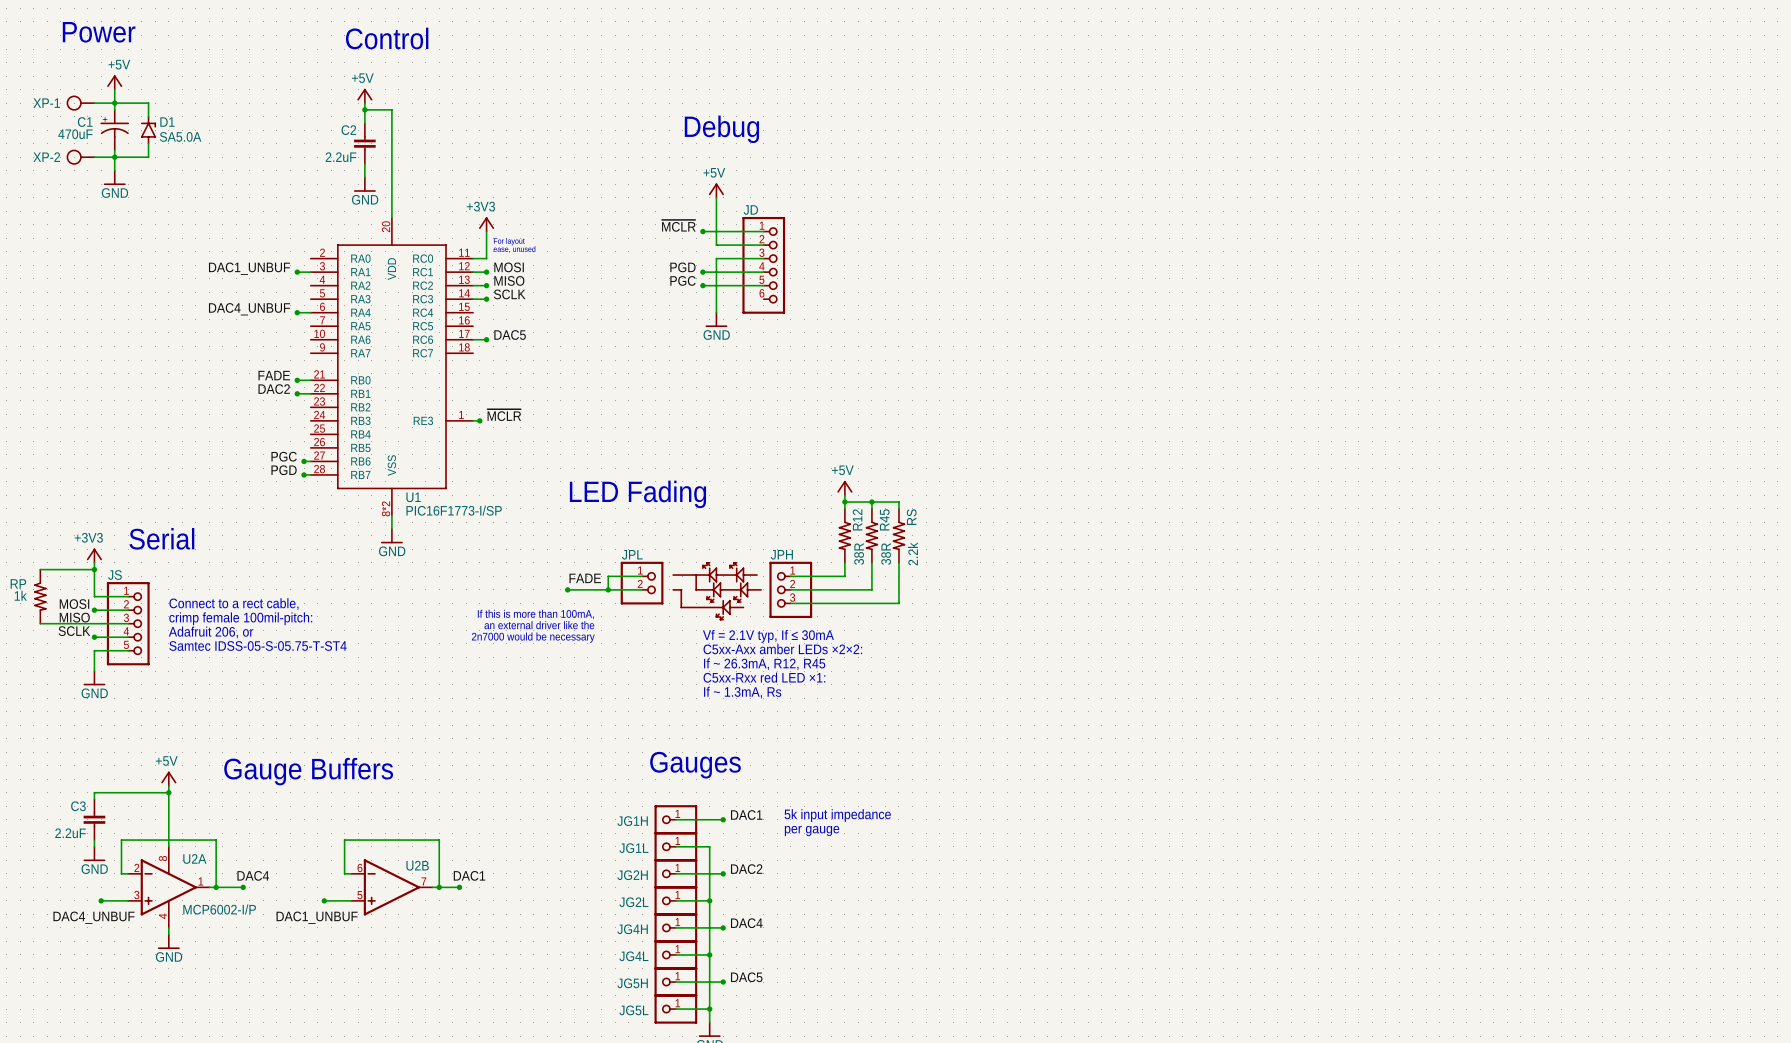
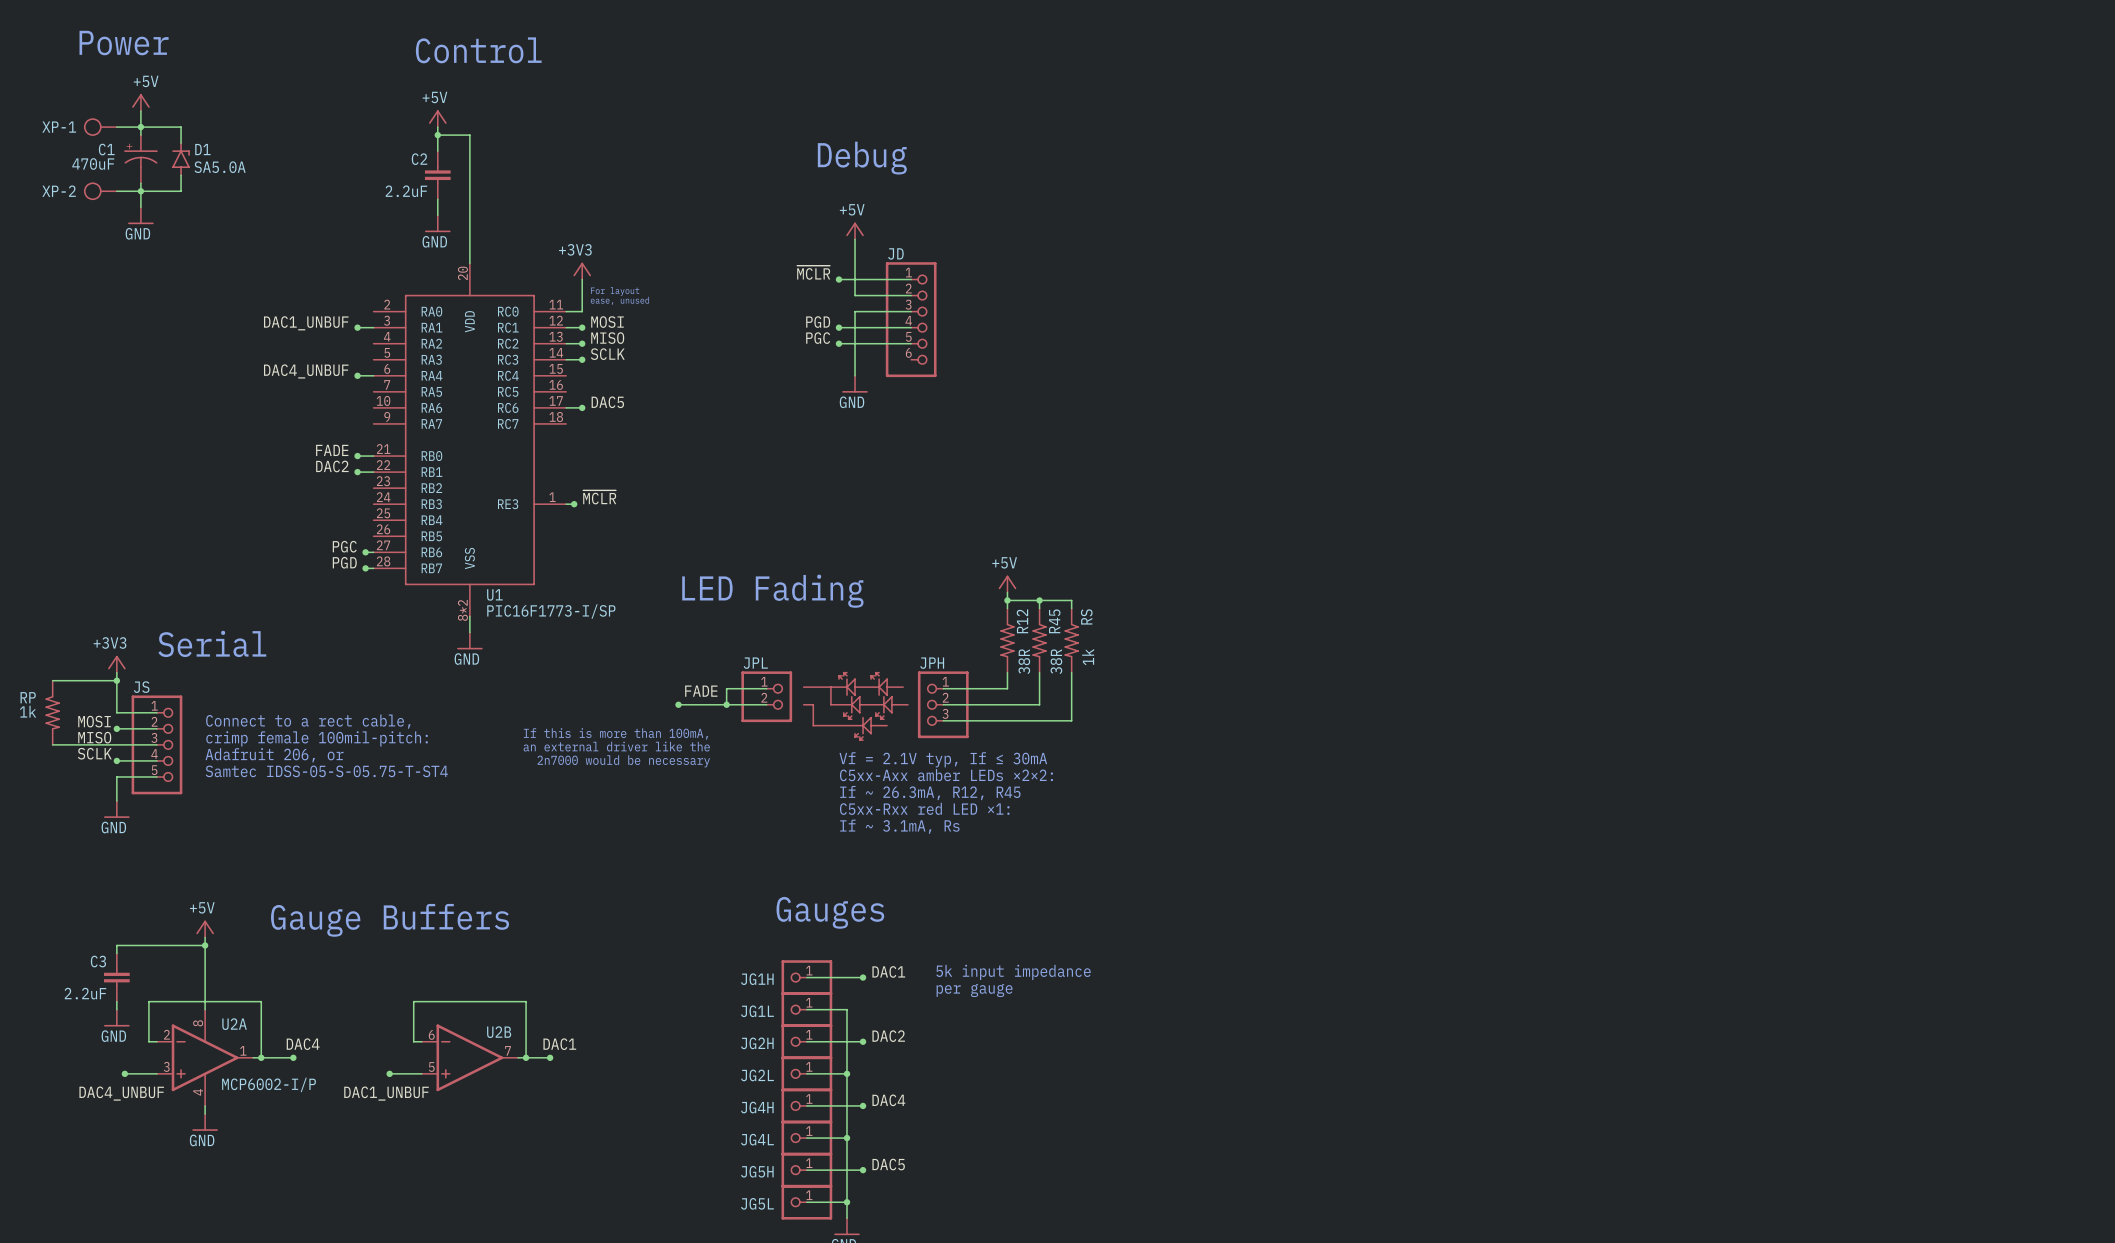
RS value: 2.2k (912, 553) -> 1k (1088, 657)
text: If ~ 1.3mA, Rs (742, 692) -> If ~ 3.1mA, Rs (899, 826)

